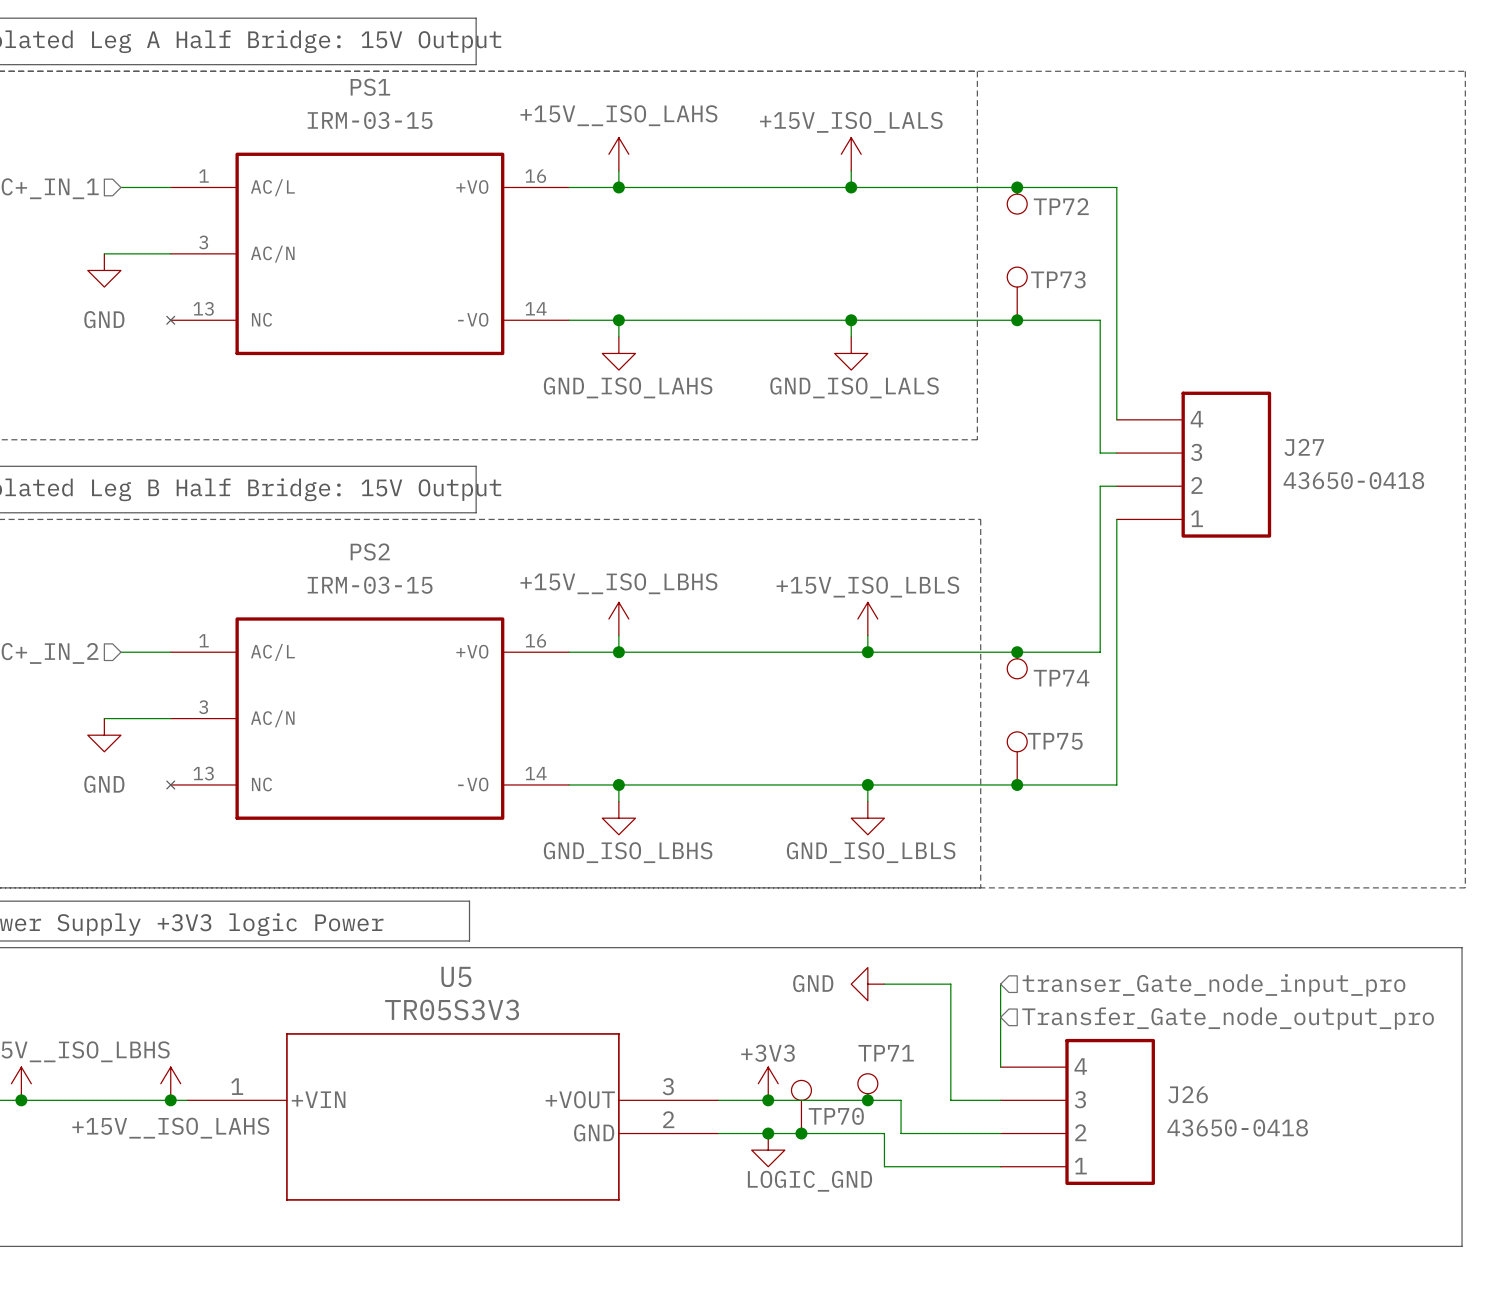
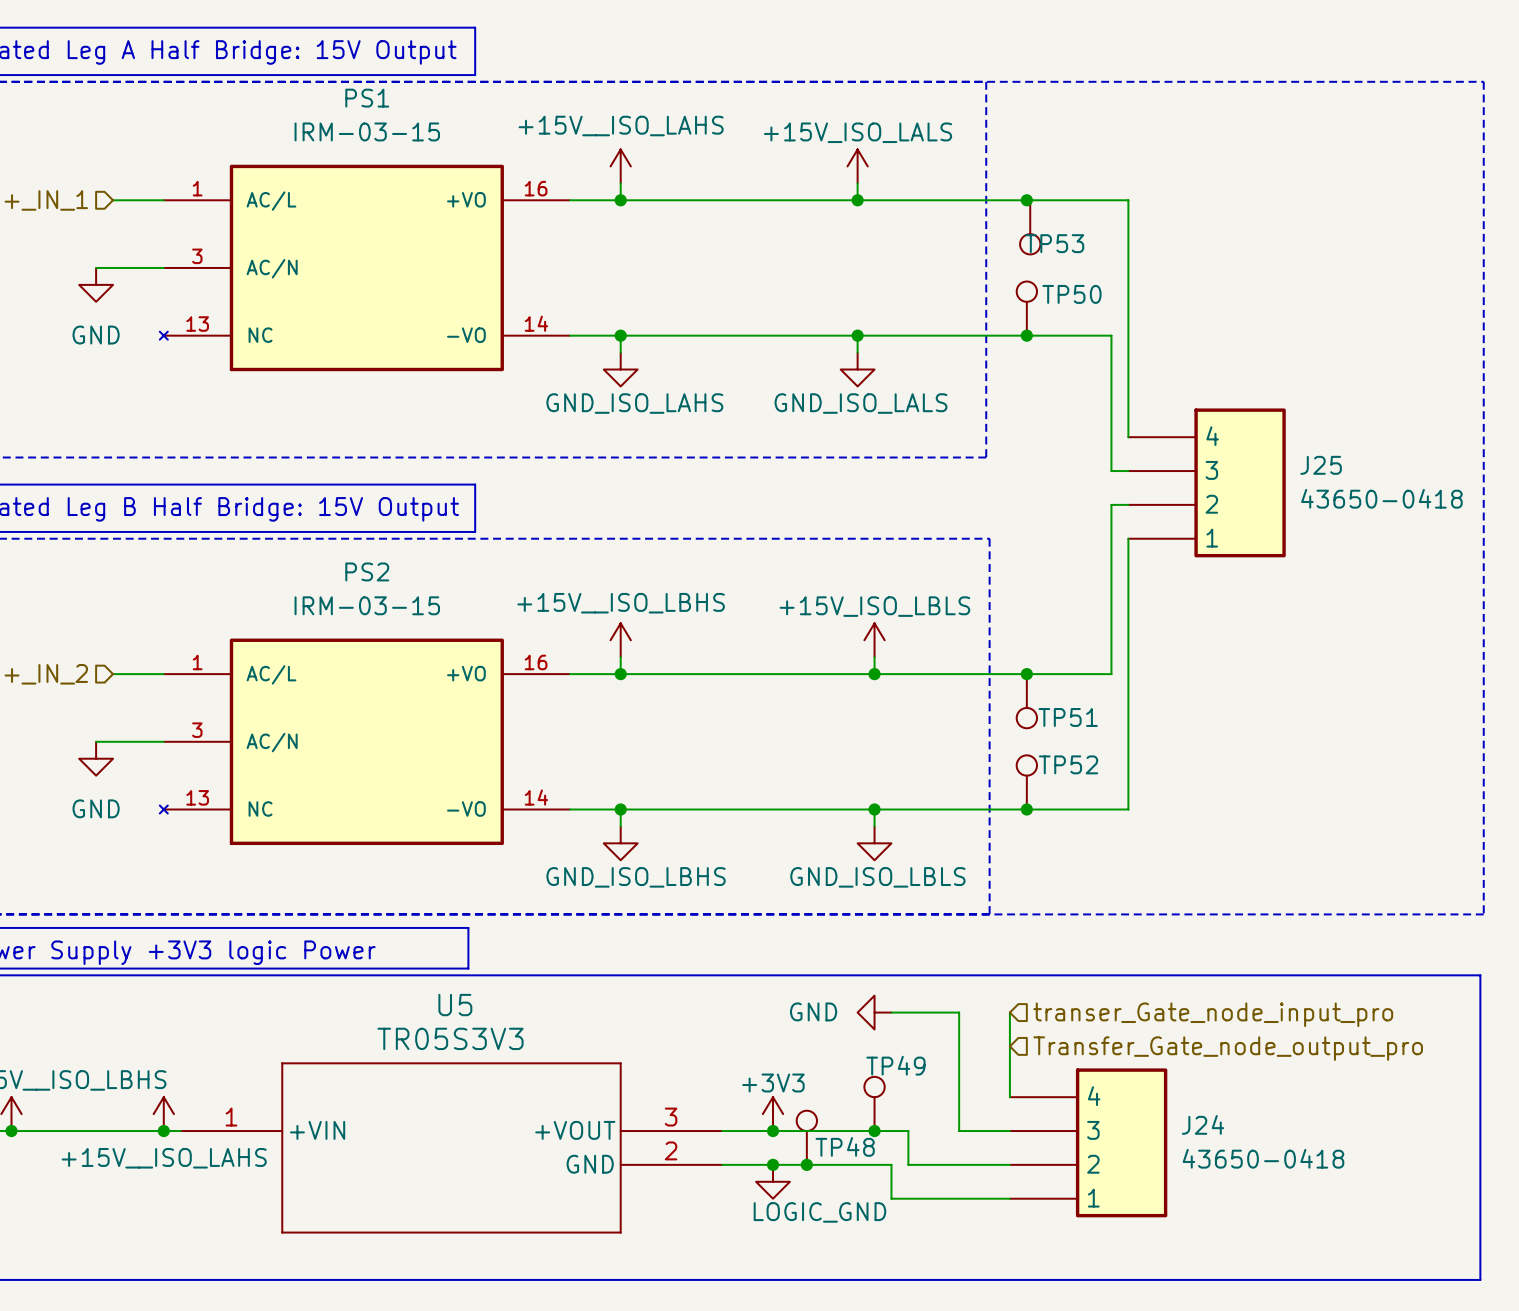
TP72: (1017, 200) -> none
TP53: none -> (1030, 227)
TP73 name: TP73 (1058, 279) -> TP50 (1071, 294)
J27 name: J27 (1304, 447) -> J25 (1321, 465)
TP74: (1017, 665) -> none
TP51: none -> (1026, 701)
TP75 name: TP75 (1055, 741) -> TP52 (1068, 764)
TP49: none -> (874, 1103)
TP71: (867, 1087) -> none
J26 name: J26 (1188, 1094) -> J24 (1203, 1124)
TP70 name: TP70 (836, 1116) -> TP48 (845, 1146)

